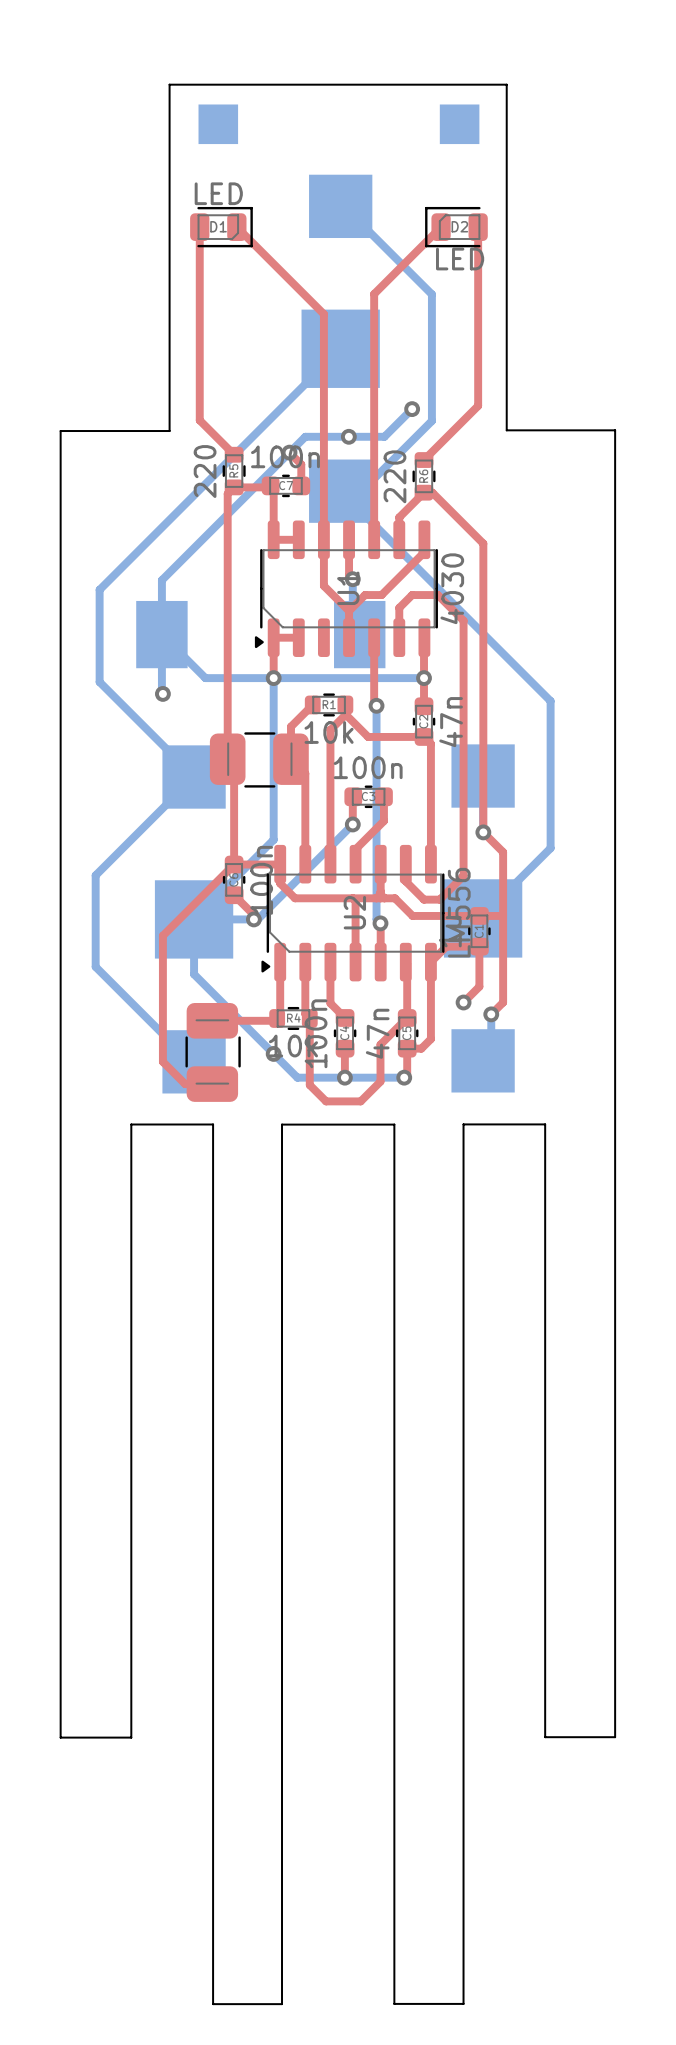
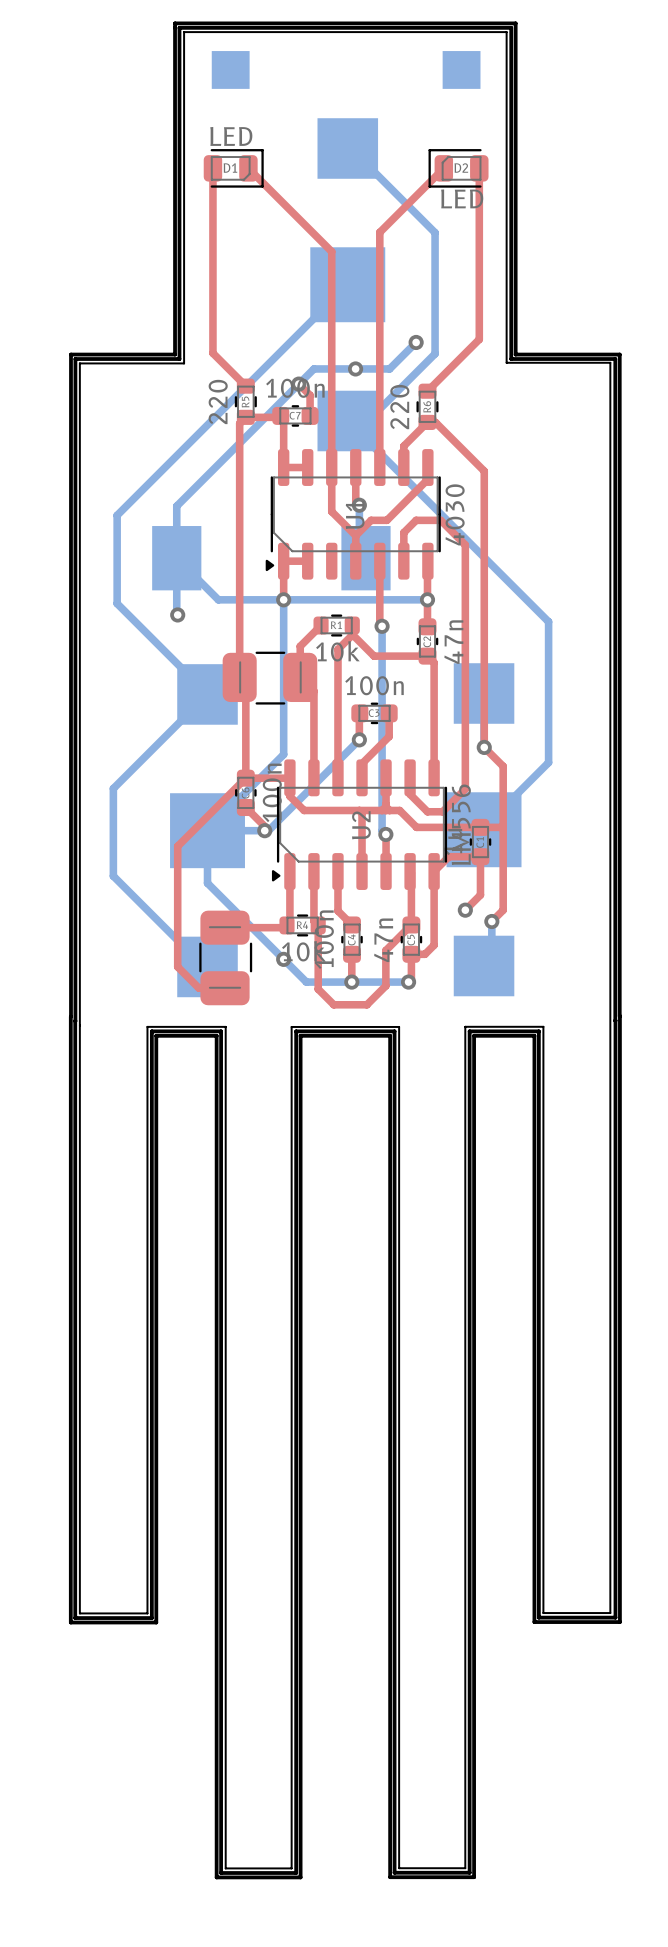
board edge: none -> (619, 1016) (619, 354) (515, 354) (515, 23) (175, 23) (175, 354) (70, 354) (70, 1016)
board edge: none -> (619, 1016) (619, 1622) (534, 1622) (534, 1035) (474, 1035) (474, 1877) (390, 1877) (390, 1035) (300, 1035) (300, 1877) (216, 1877) (216, 1035) (156, 1035) (156, 1622) (70, 1622) (70, 1016)
board edge: none -> (615, 1020) (615, 359) (511, 359) (511, 27) (179, 27) (179, 359) (75, 359) (75, 1618) (151, 1618) (151, 1031) (221, 1031) (221, 1873) (296, 1873) (296, 1031) (394, 1031) (394, 1872) (469, 1872) (469, 1031) (538, 1031) (538, 1617) (615, 1617) (615, 1020)

